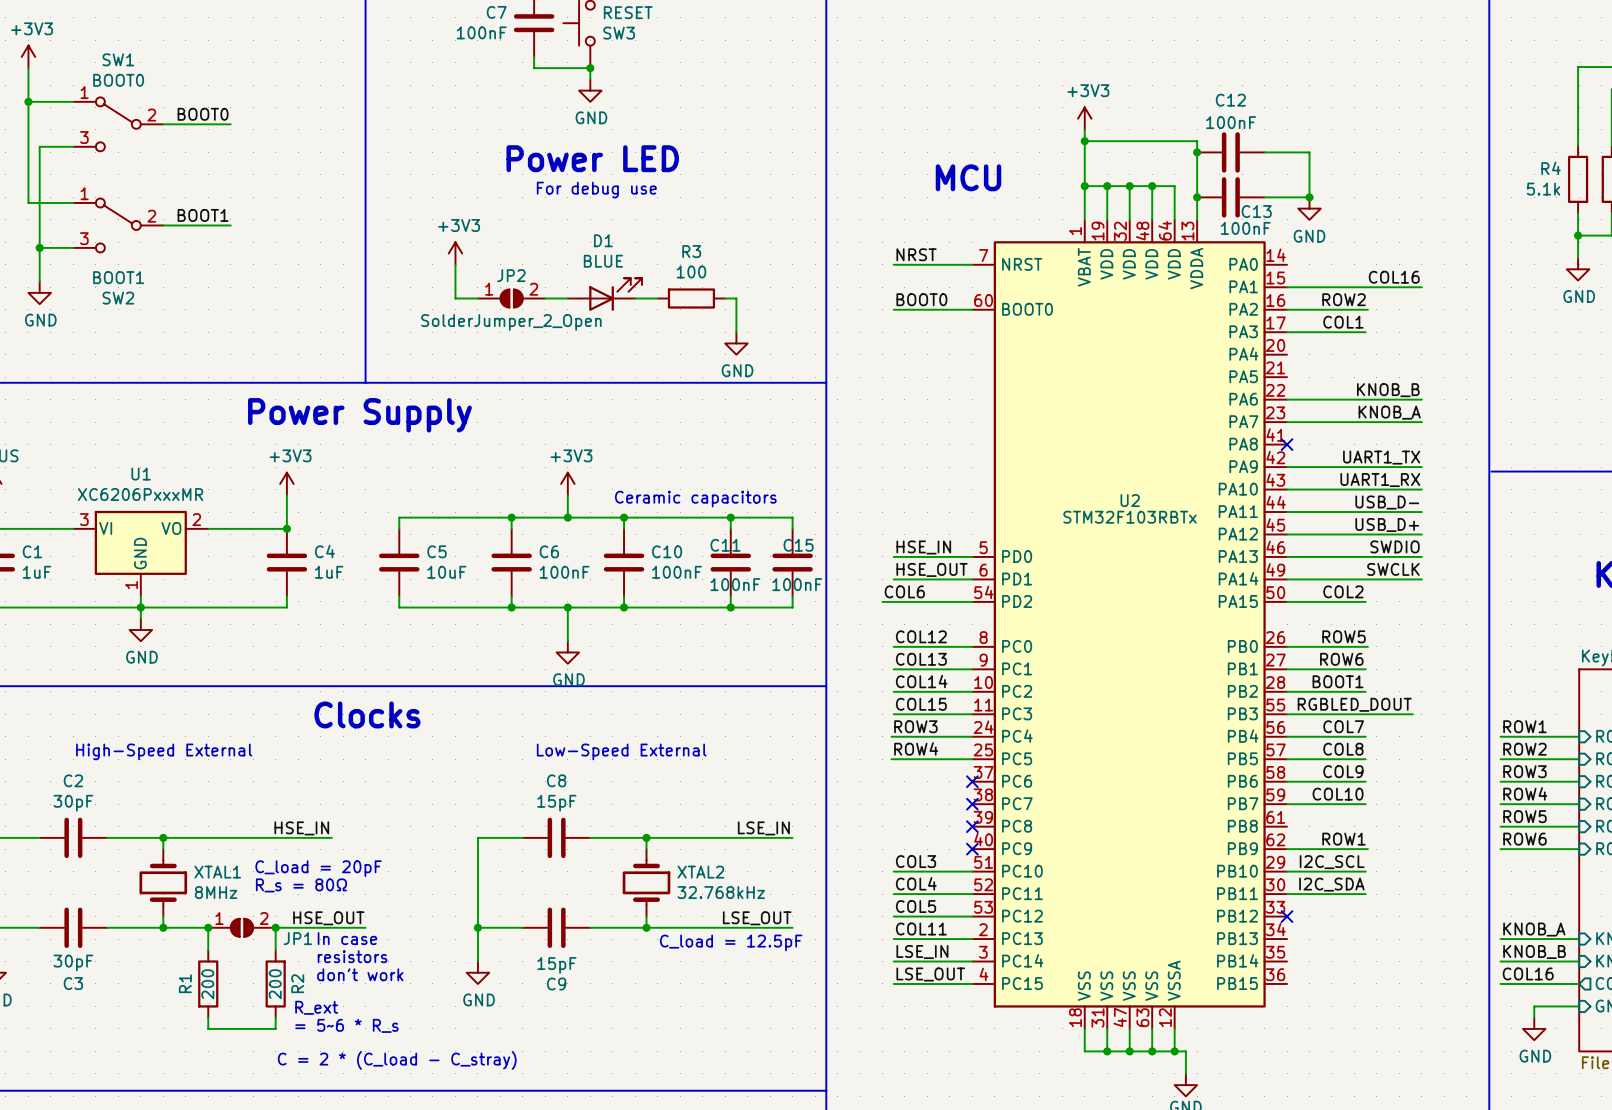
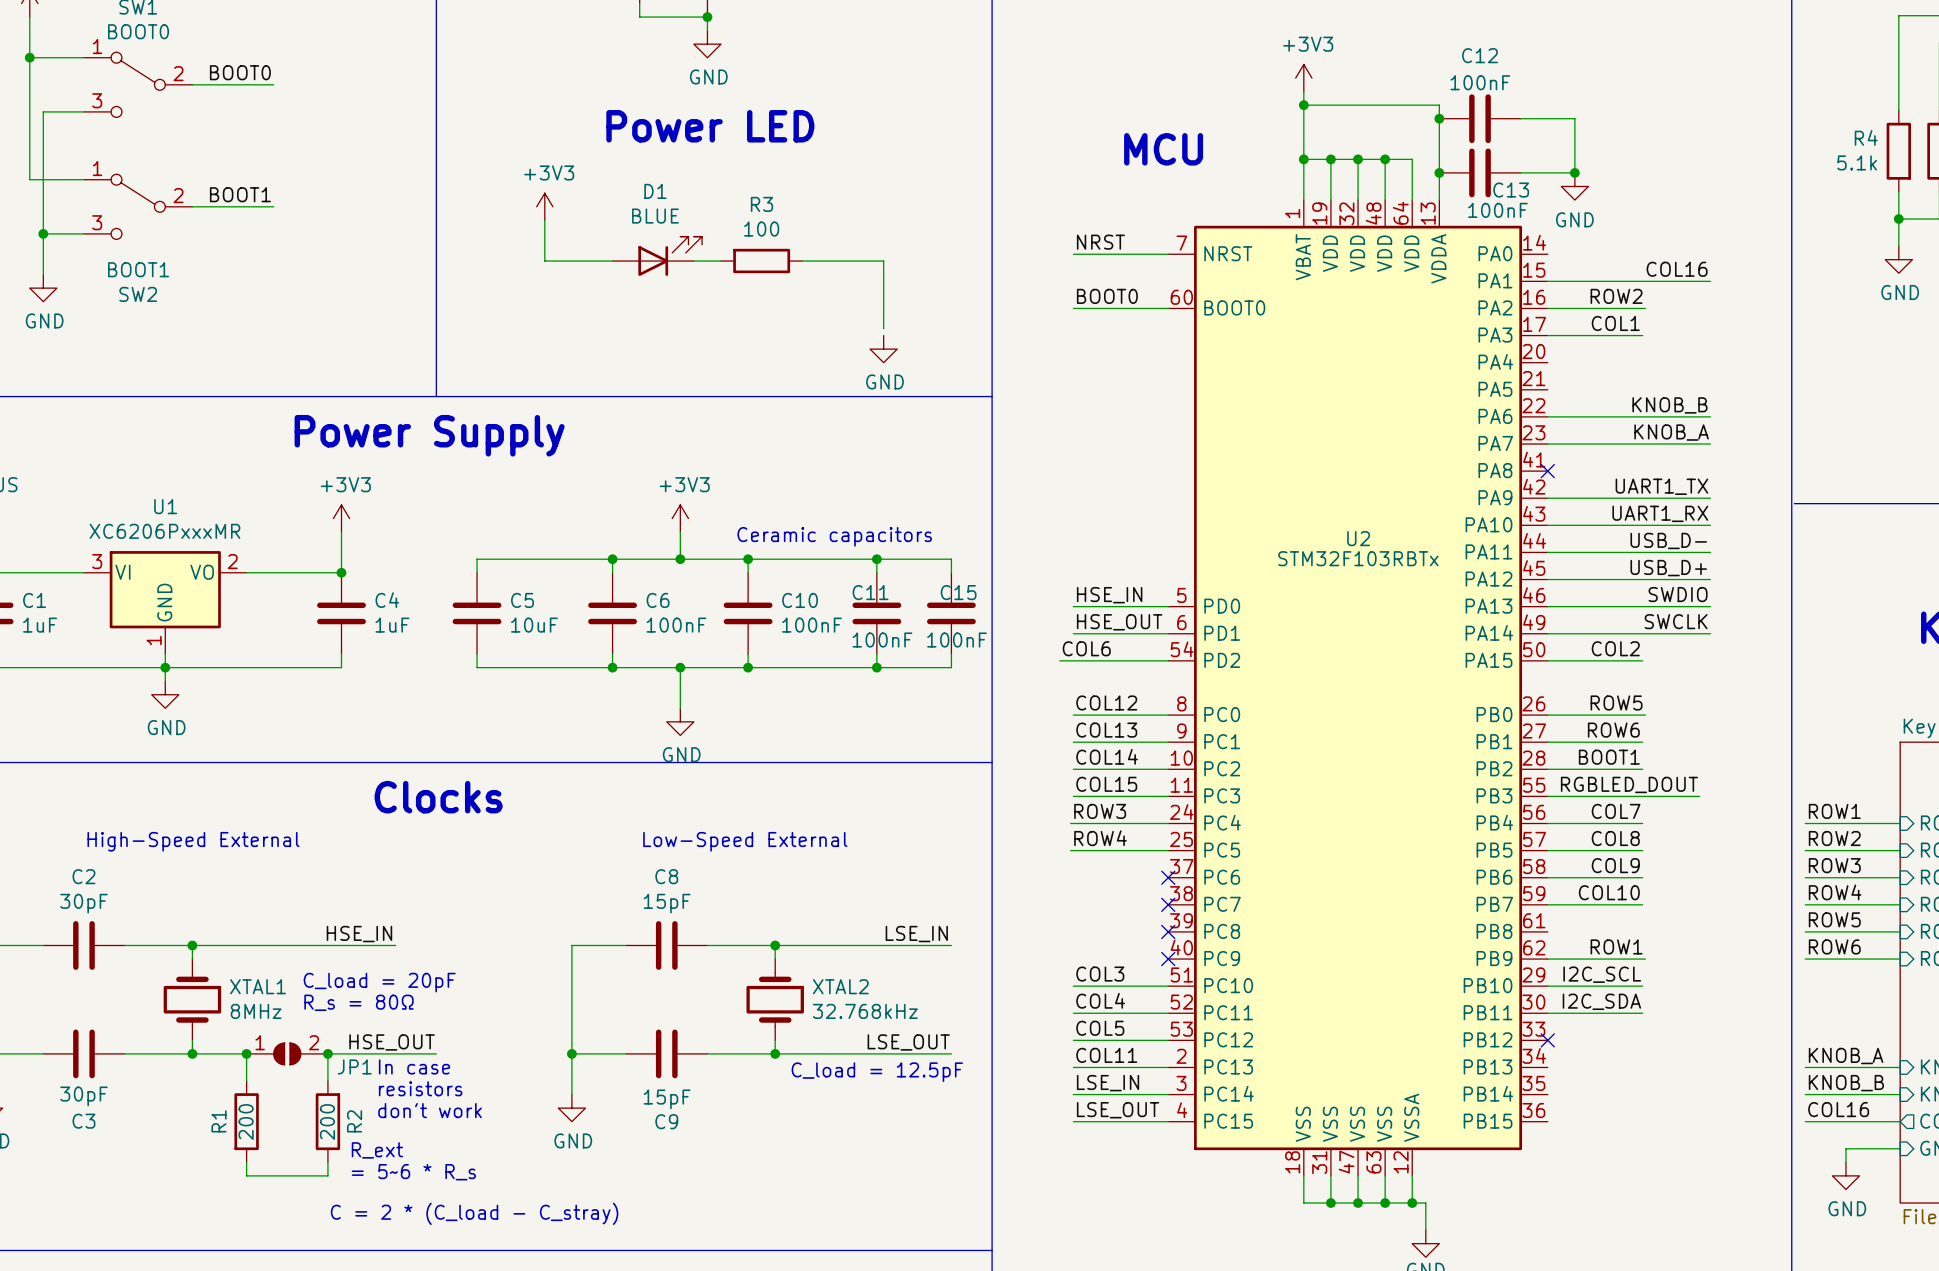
text: For debug use (596, 190) -> none
power symbol position: +3V3 (455, 253) -> +3V3 (544, 206)
wire: (455, 270) (455, 298) (477, 298) -> (544, 261) (612, 261)
D1 position: (604, 294) -> (657, 256)
JP2: SolderJumper_2_Open (511, 298) -> none
wire: (545, 298) (567, 298) -> (693, 261) (721, 261)
wire: (635, 298) (657, 298) -> none
R3 position: (691, 298) -> (761, 261)
wire: (725, 298) (736, 298) -> (802, 261) (883, 261) (883, 294)
wire: (736, 326) (736, 332) -> none

